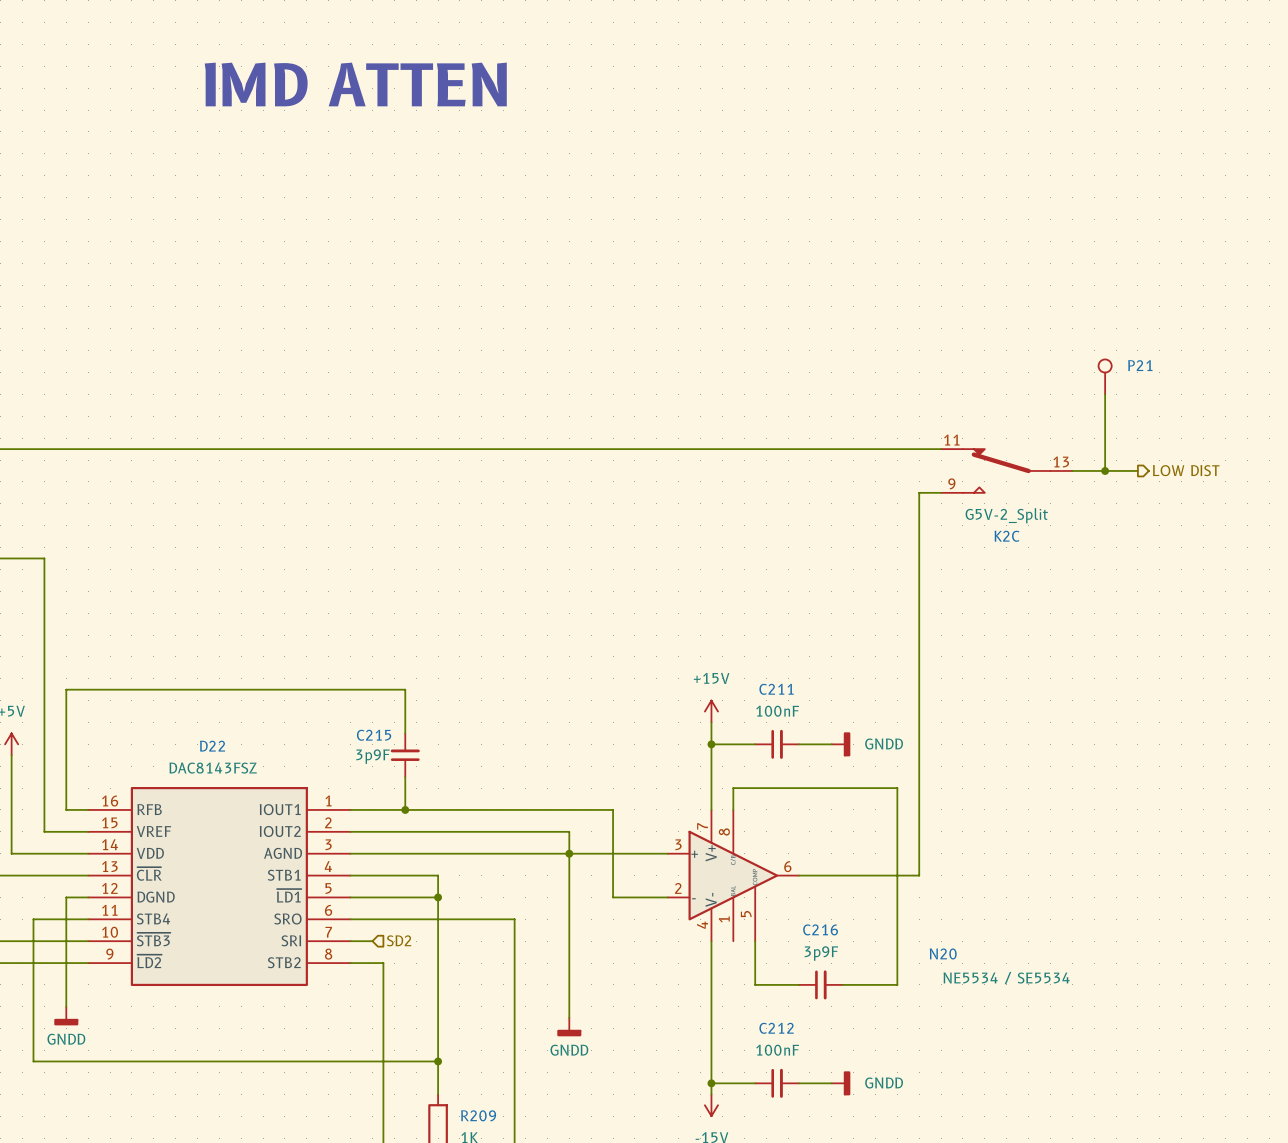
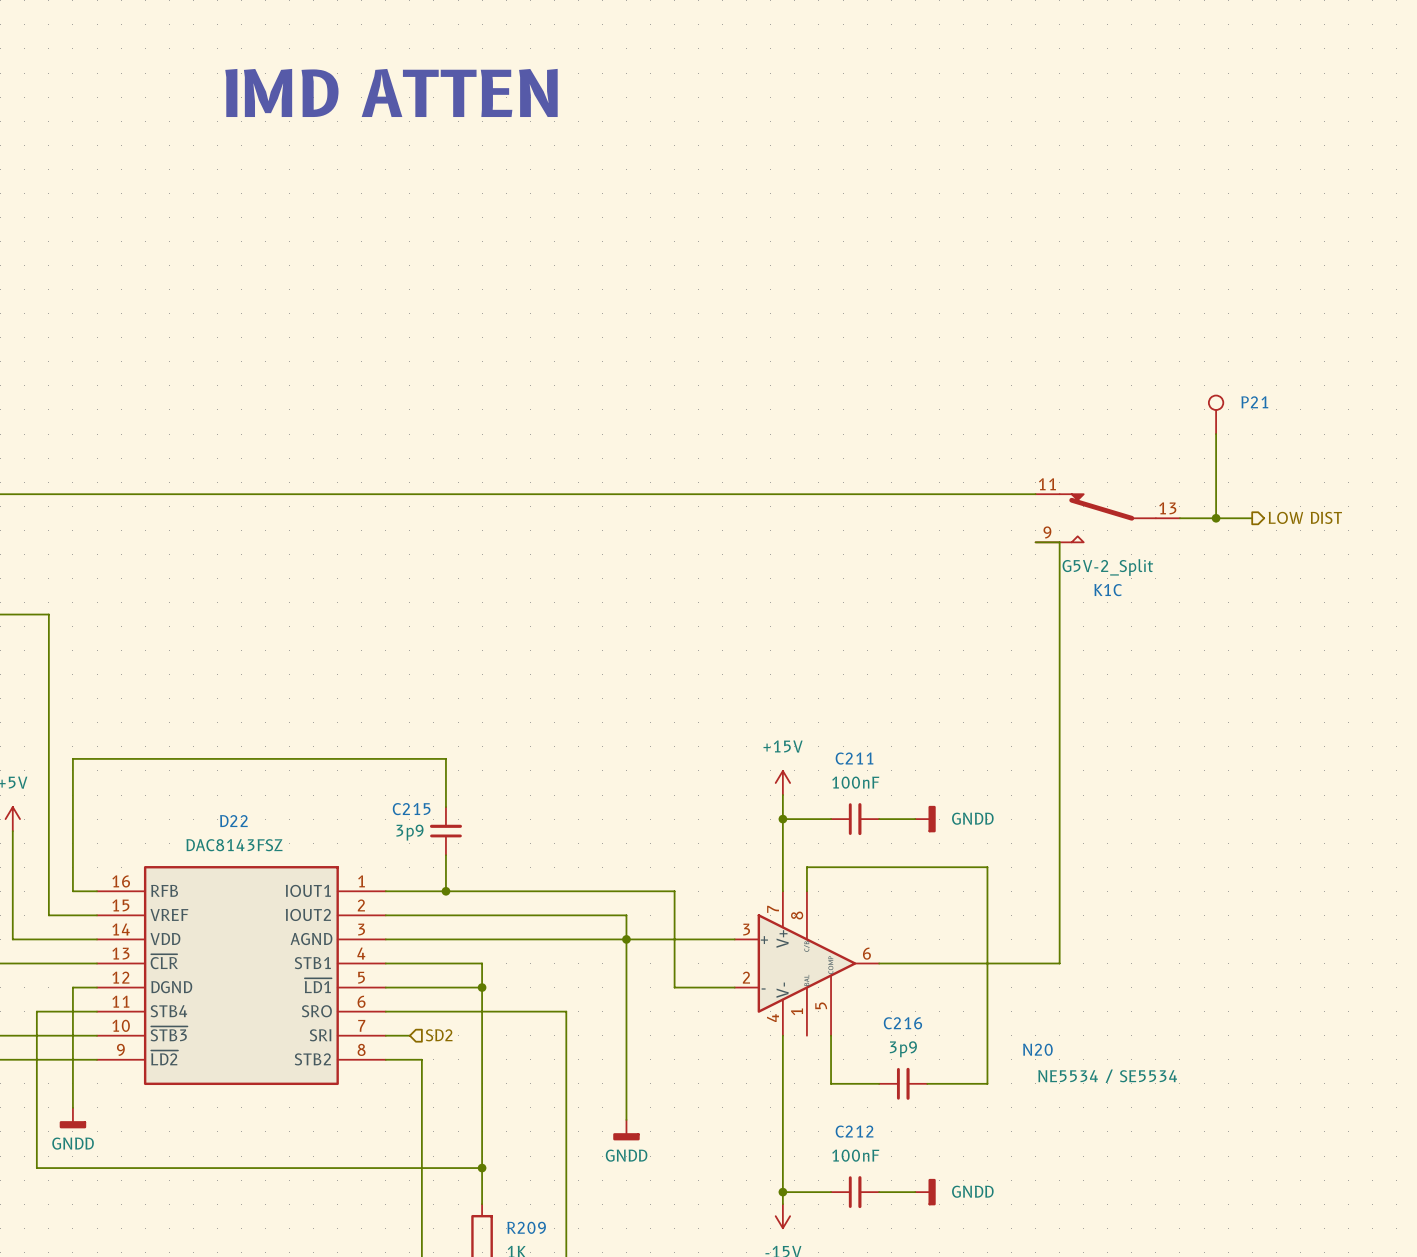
wire: (941, 492) (919, 492) (919, 875) -> (1035, 542) (1059, 542) (1059, 963) (1011, 963)
K2C name: K2C (1007, 536) -> K1C (1108, 590)
C215 value: 3p9F (372, 756) -> 3p9 (409, 832)
C216 value: 3p9F (821, 953) -> 3p9 (903, 1049)

